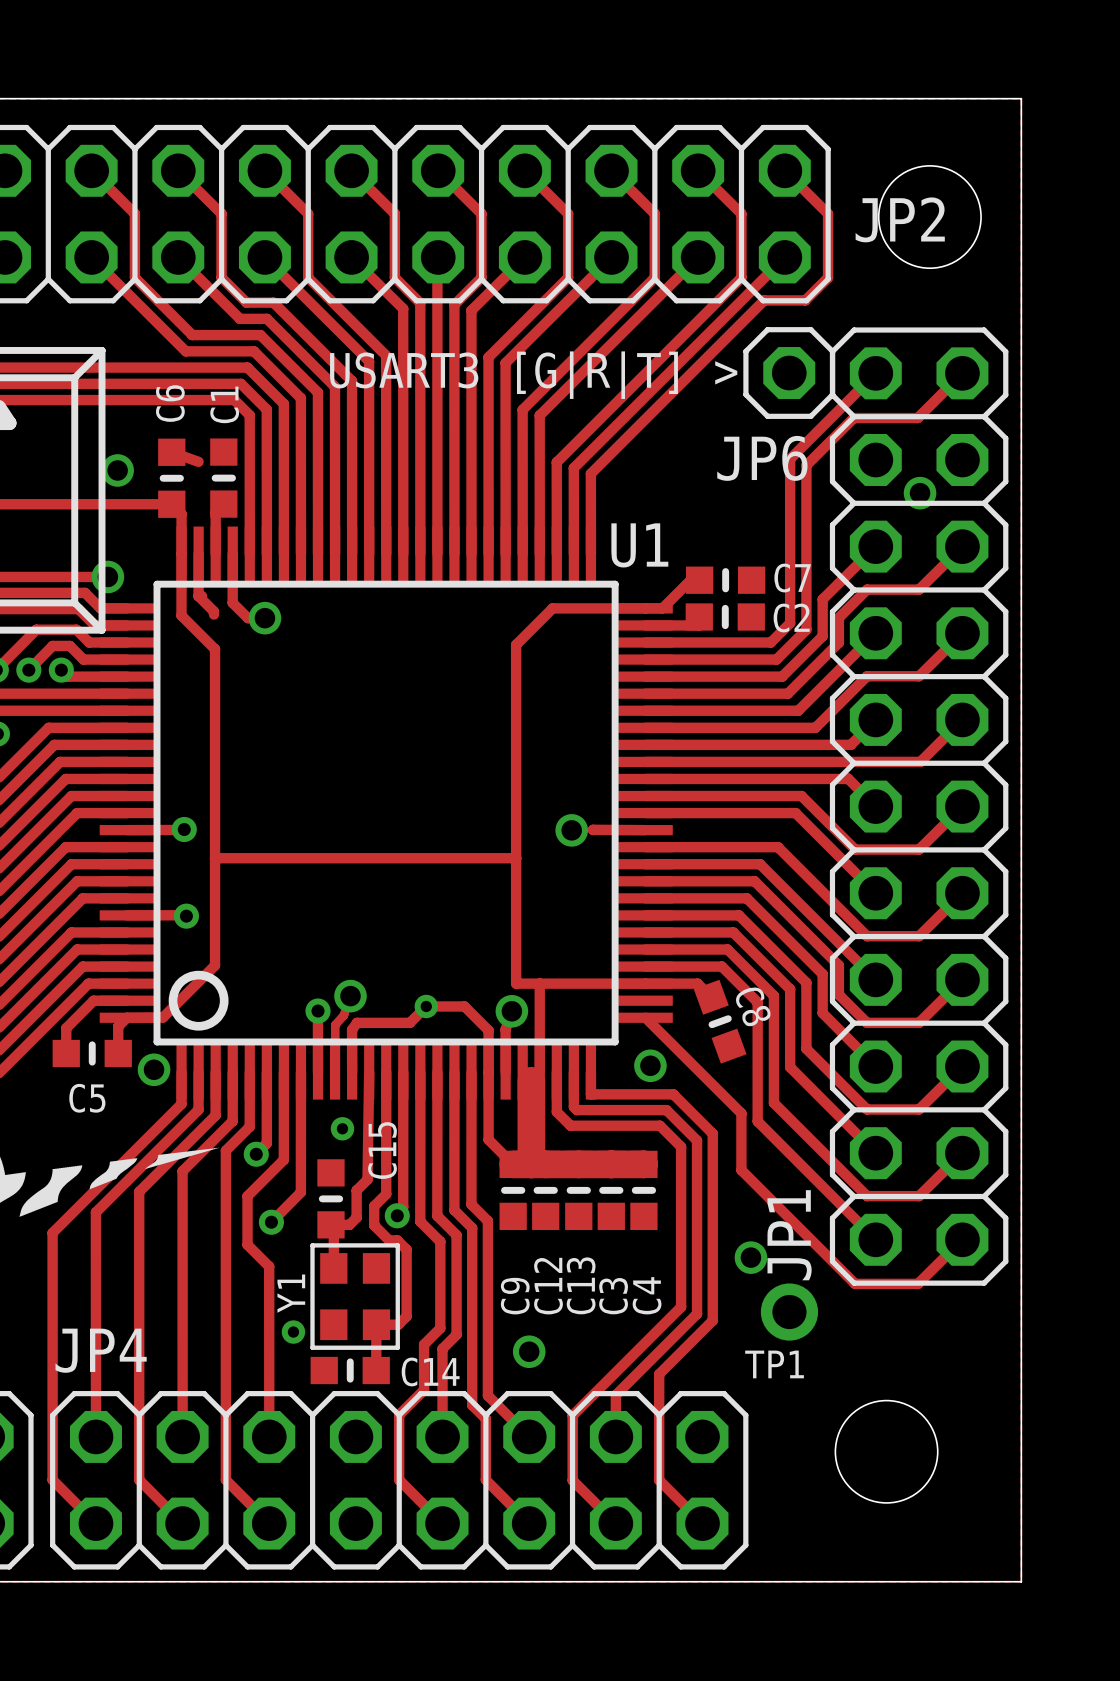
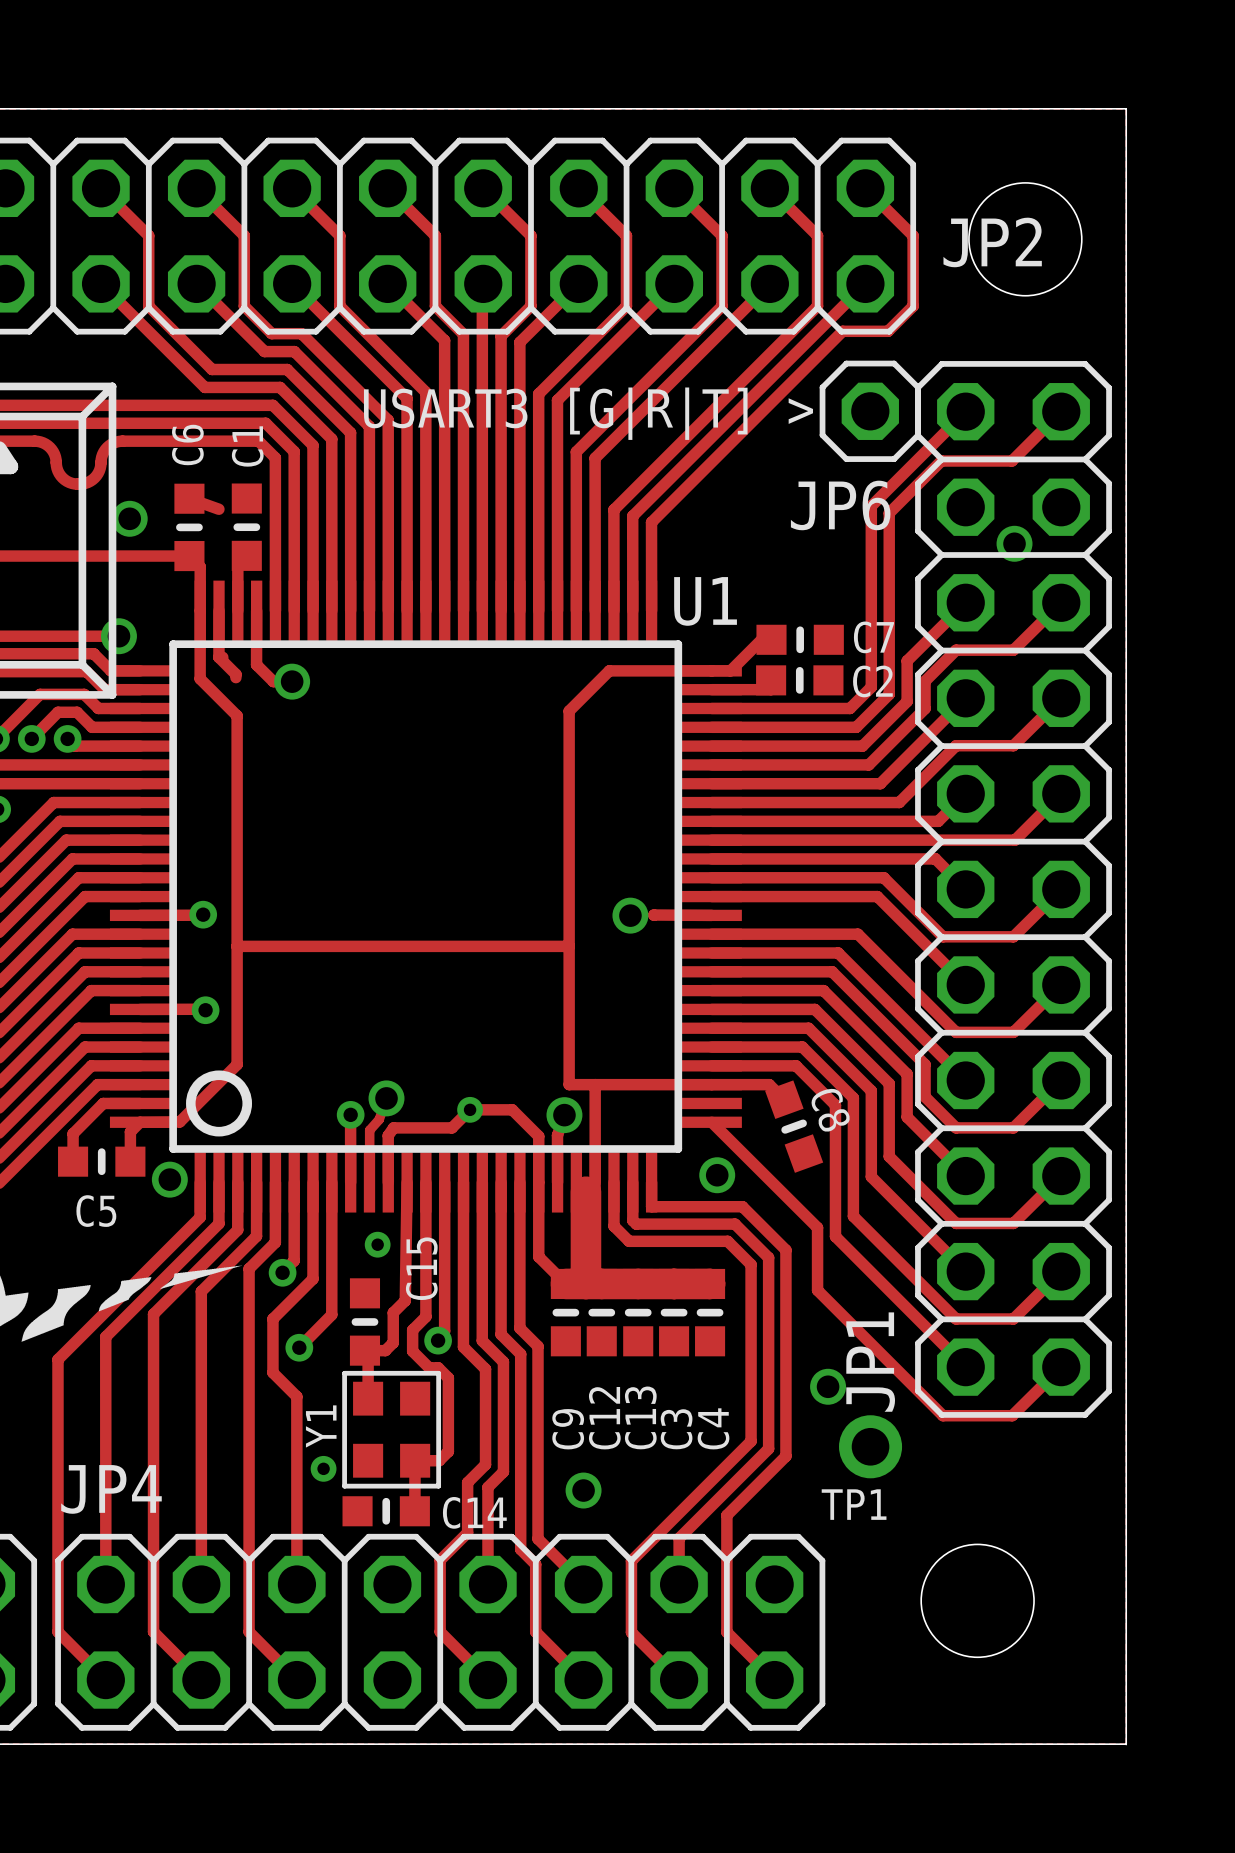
track: (31, 400) (111, 400) -> (34, 441) (42, 442) (51, 449) (55, 457) (57, 470) (62, 477) (69, 482) (77, 484) (87, 482) (94, 477) (99, 470) (101, 457) (105, 449) (114, 442) (122, 441)

